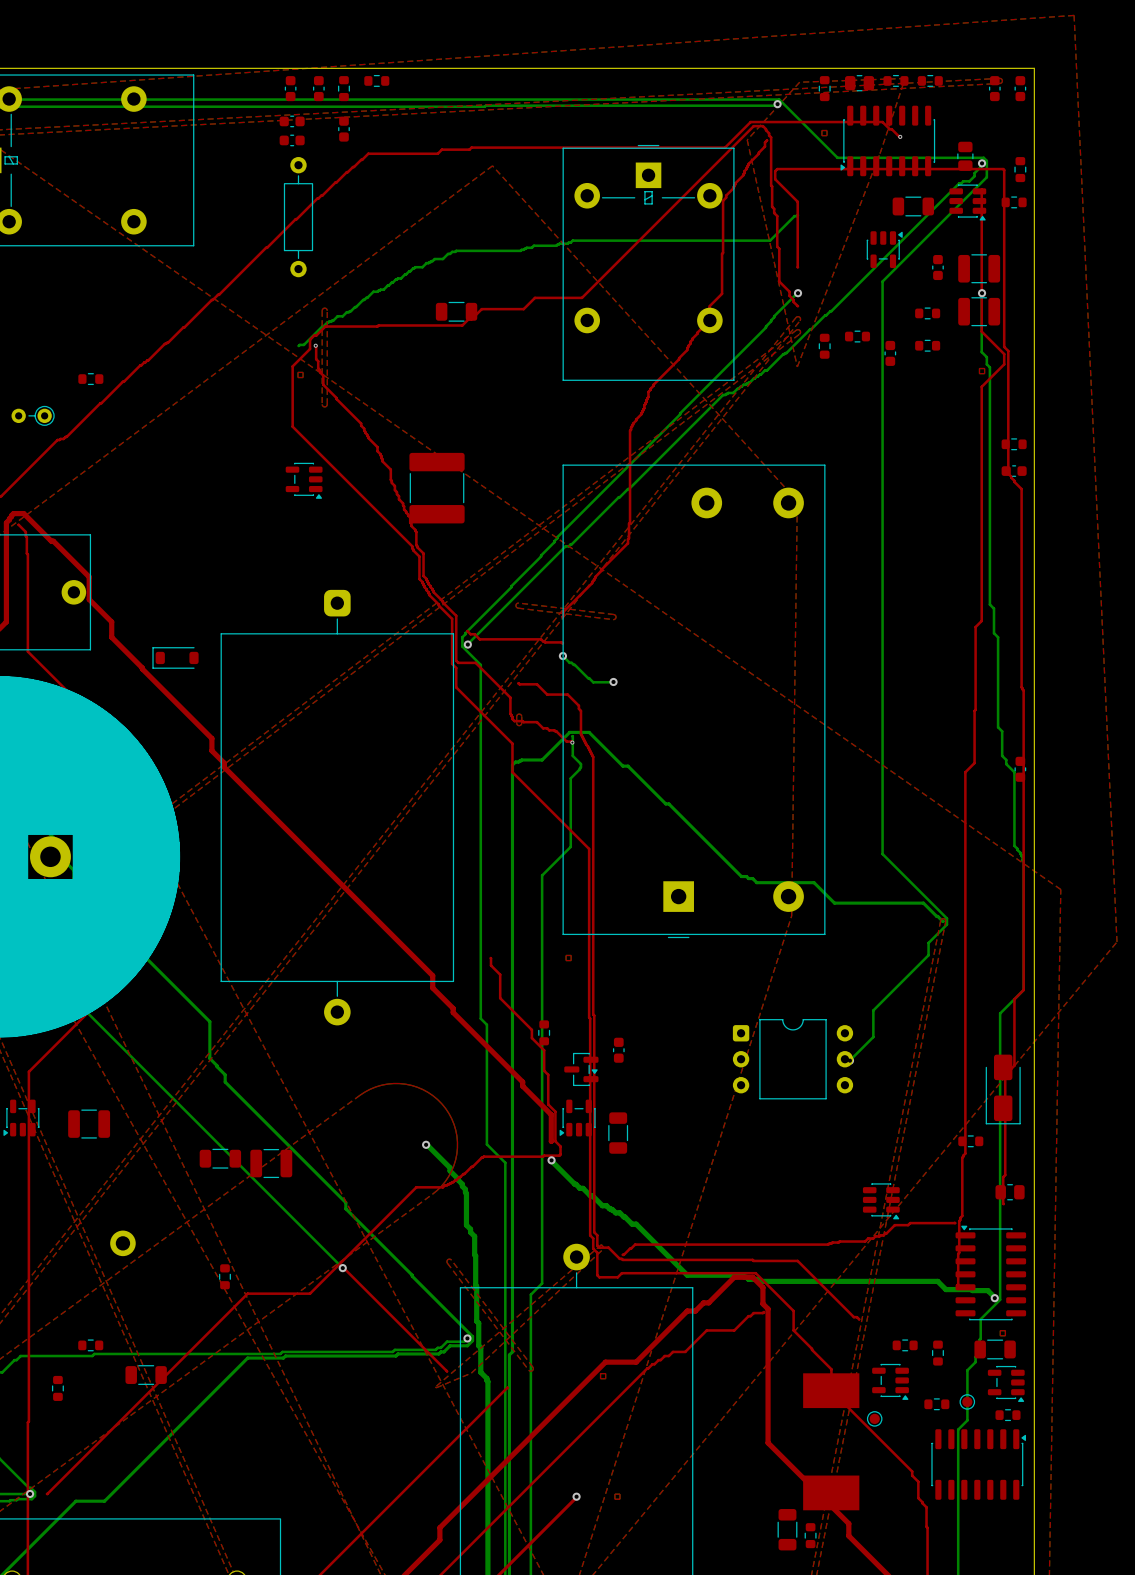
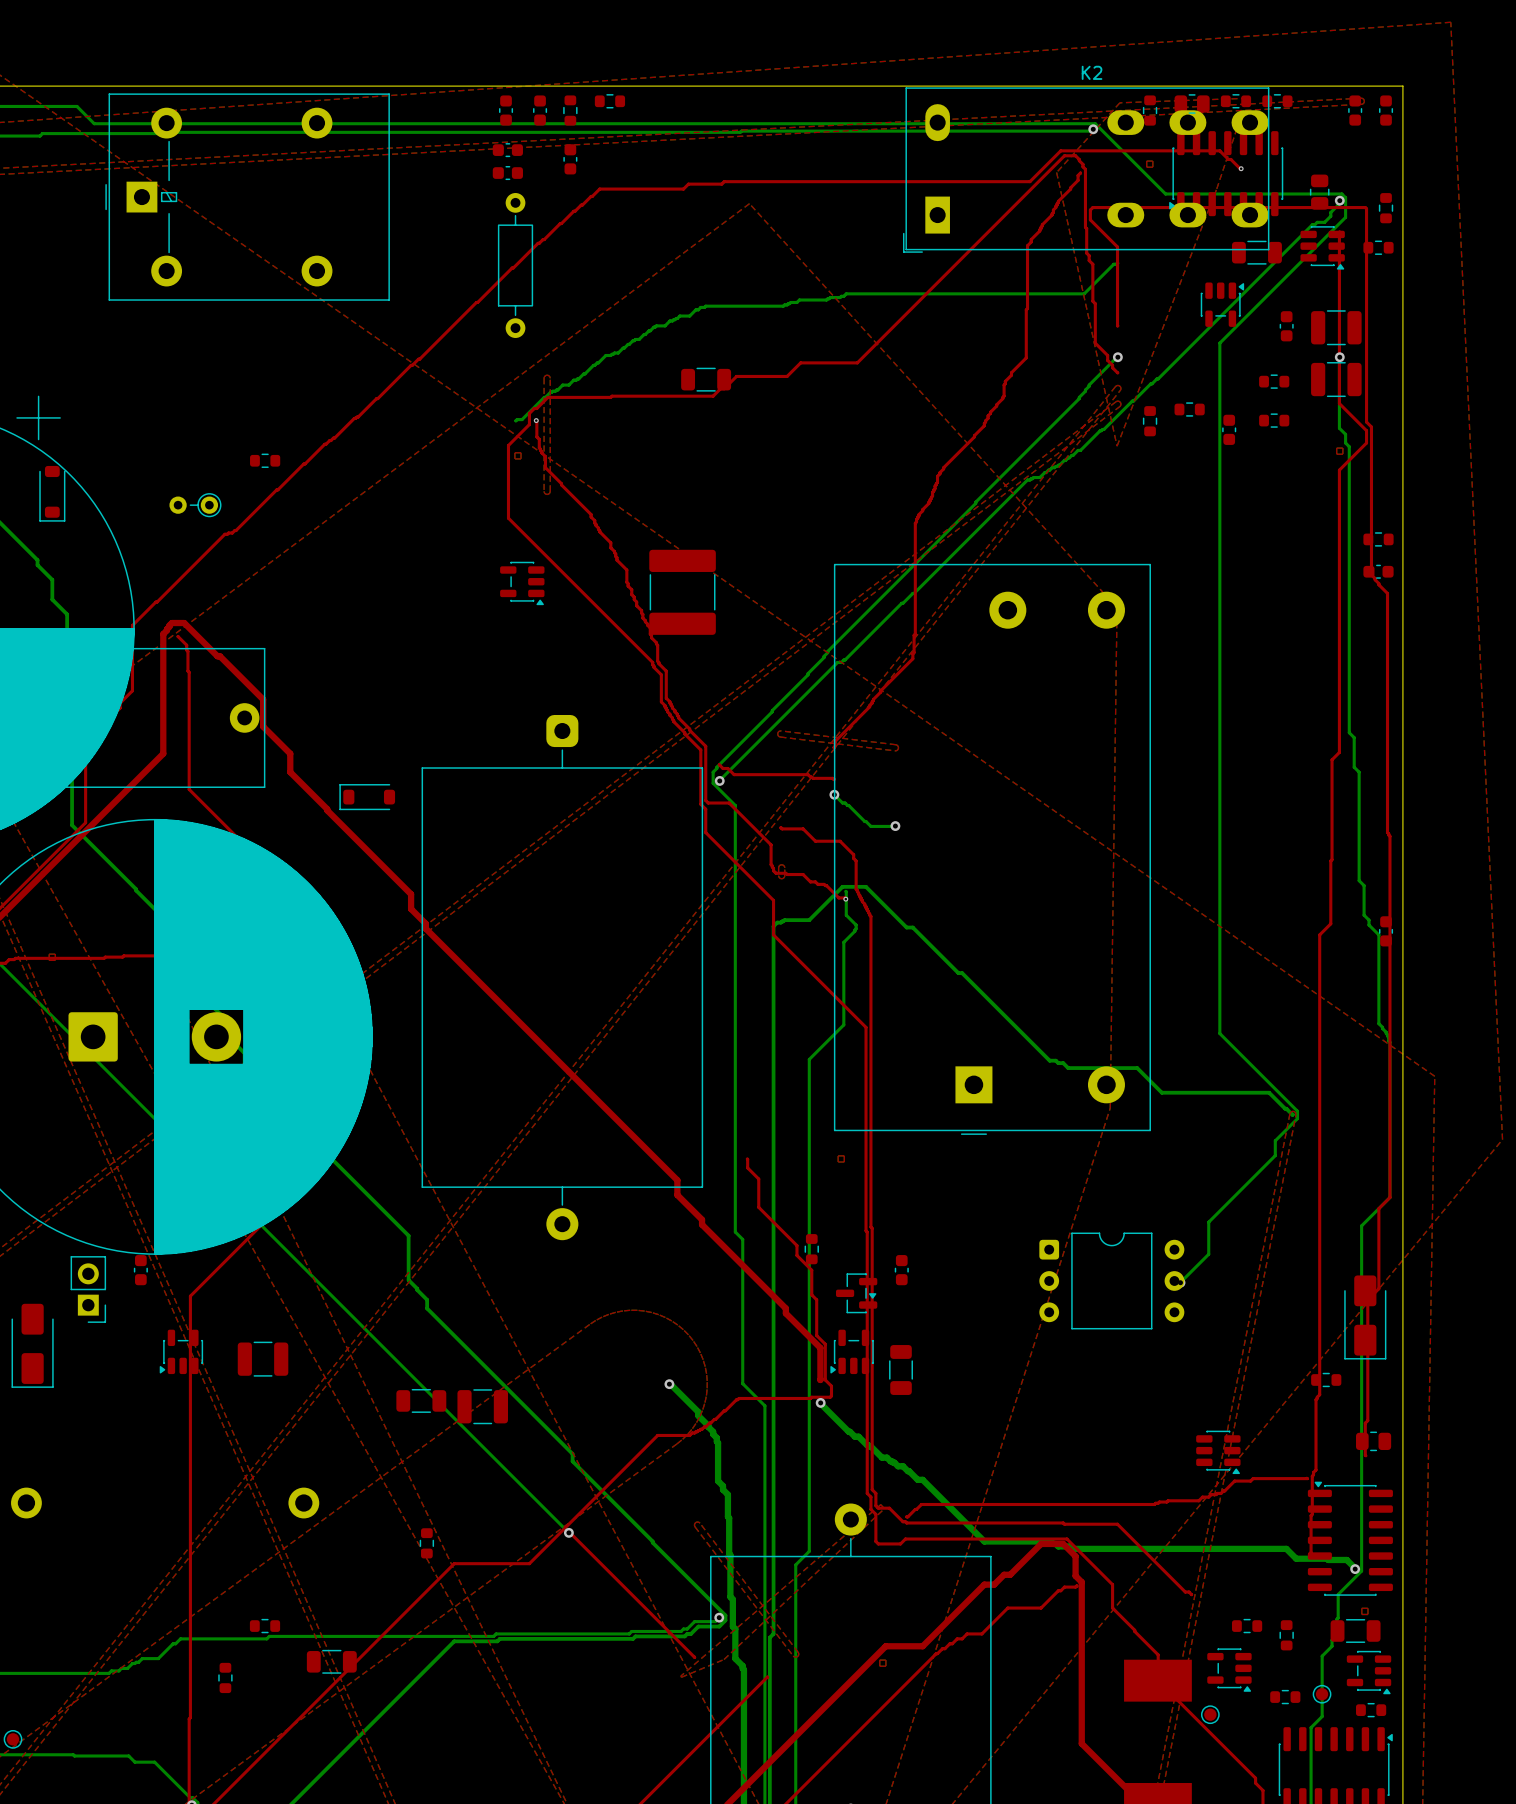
K2: none -> (1086, 170)
part: (648, 262) -> none

